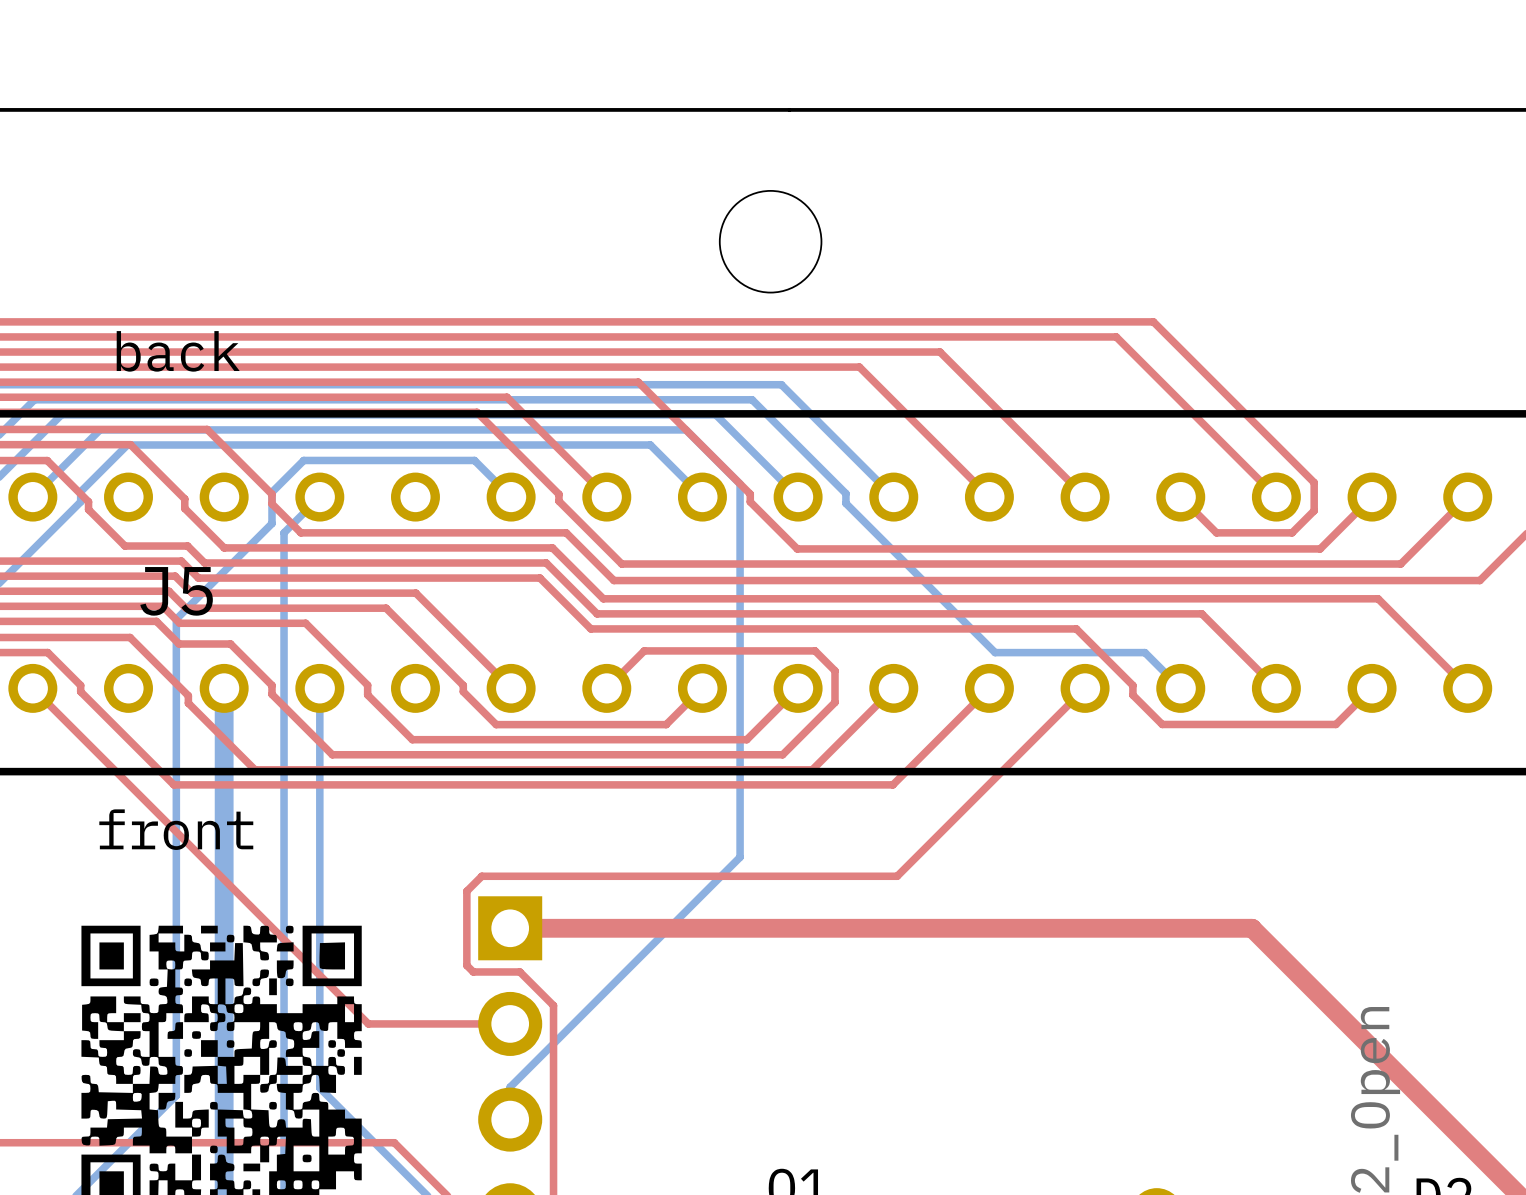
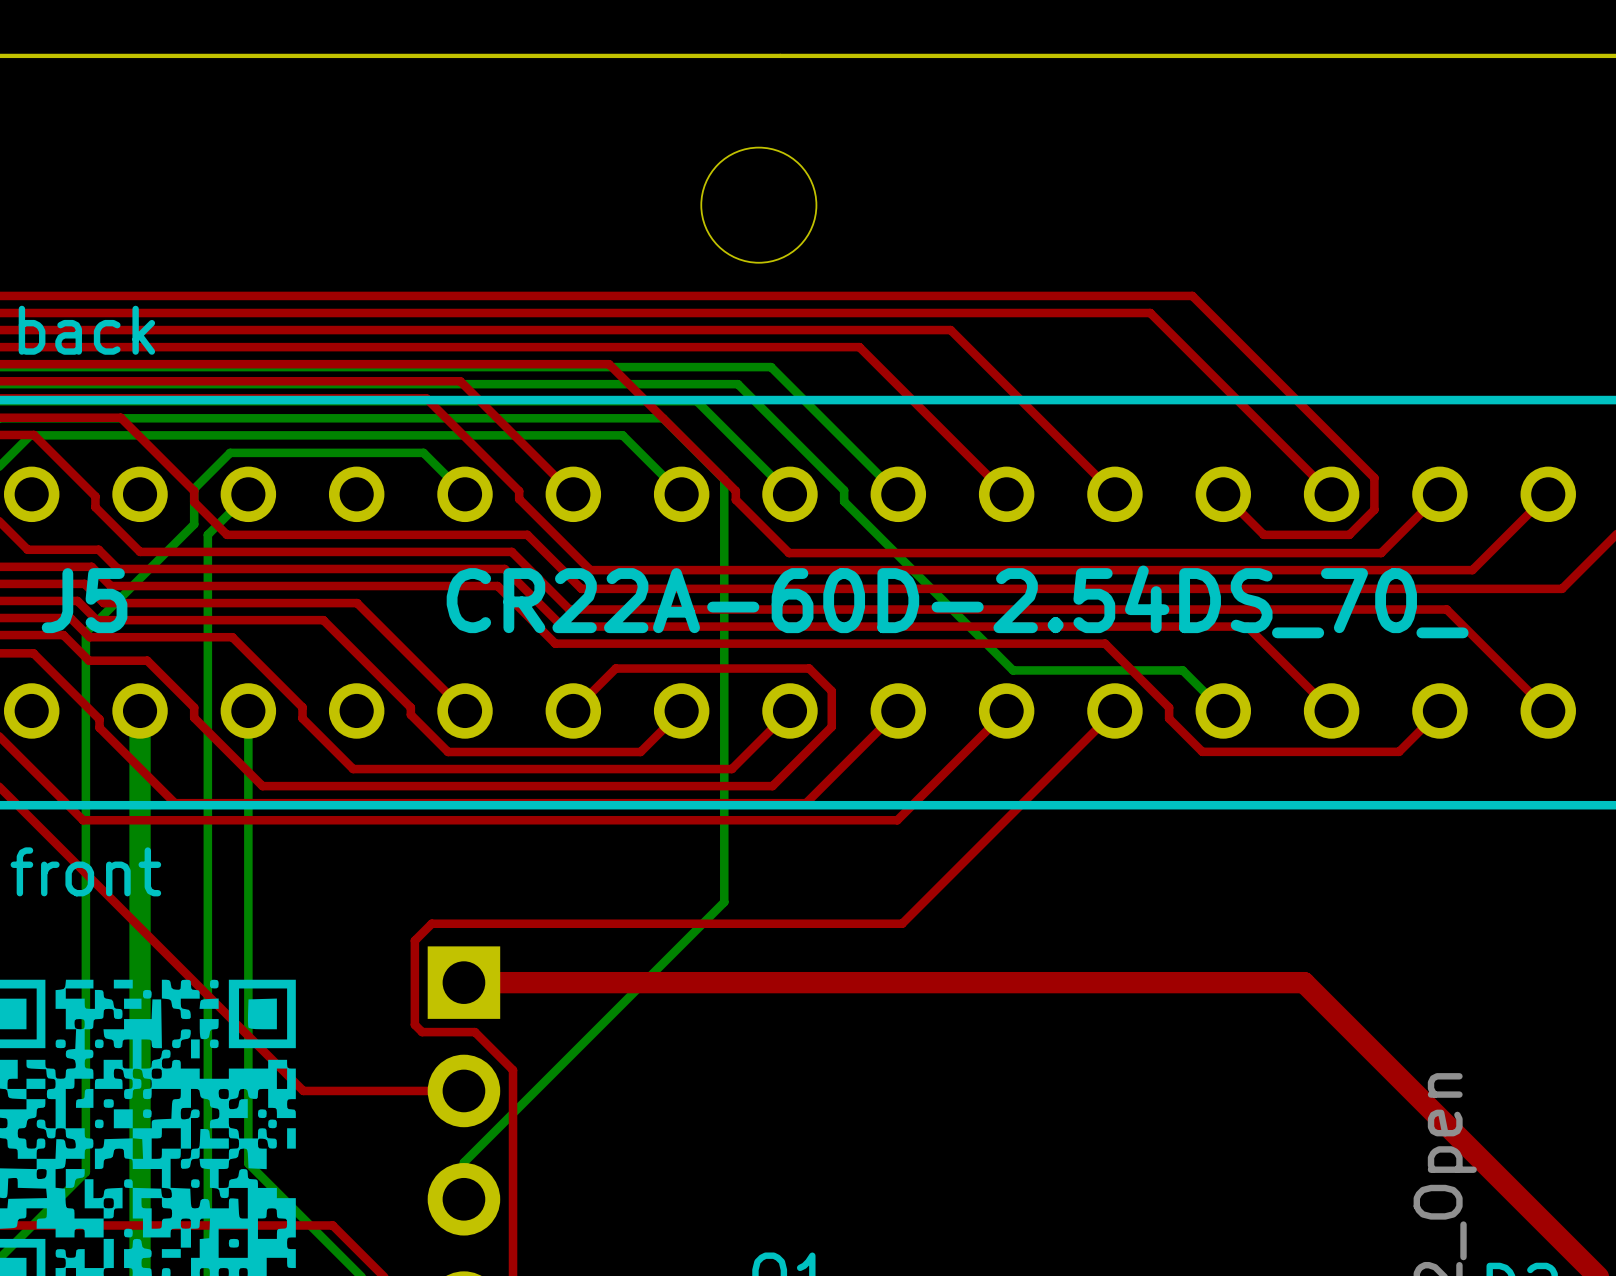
J5 value: none -> CR22A-60D-2.54DS_70_ (957, 601)

